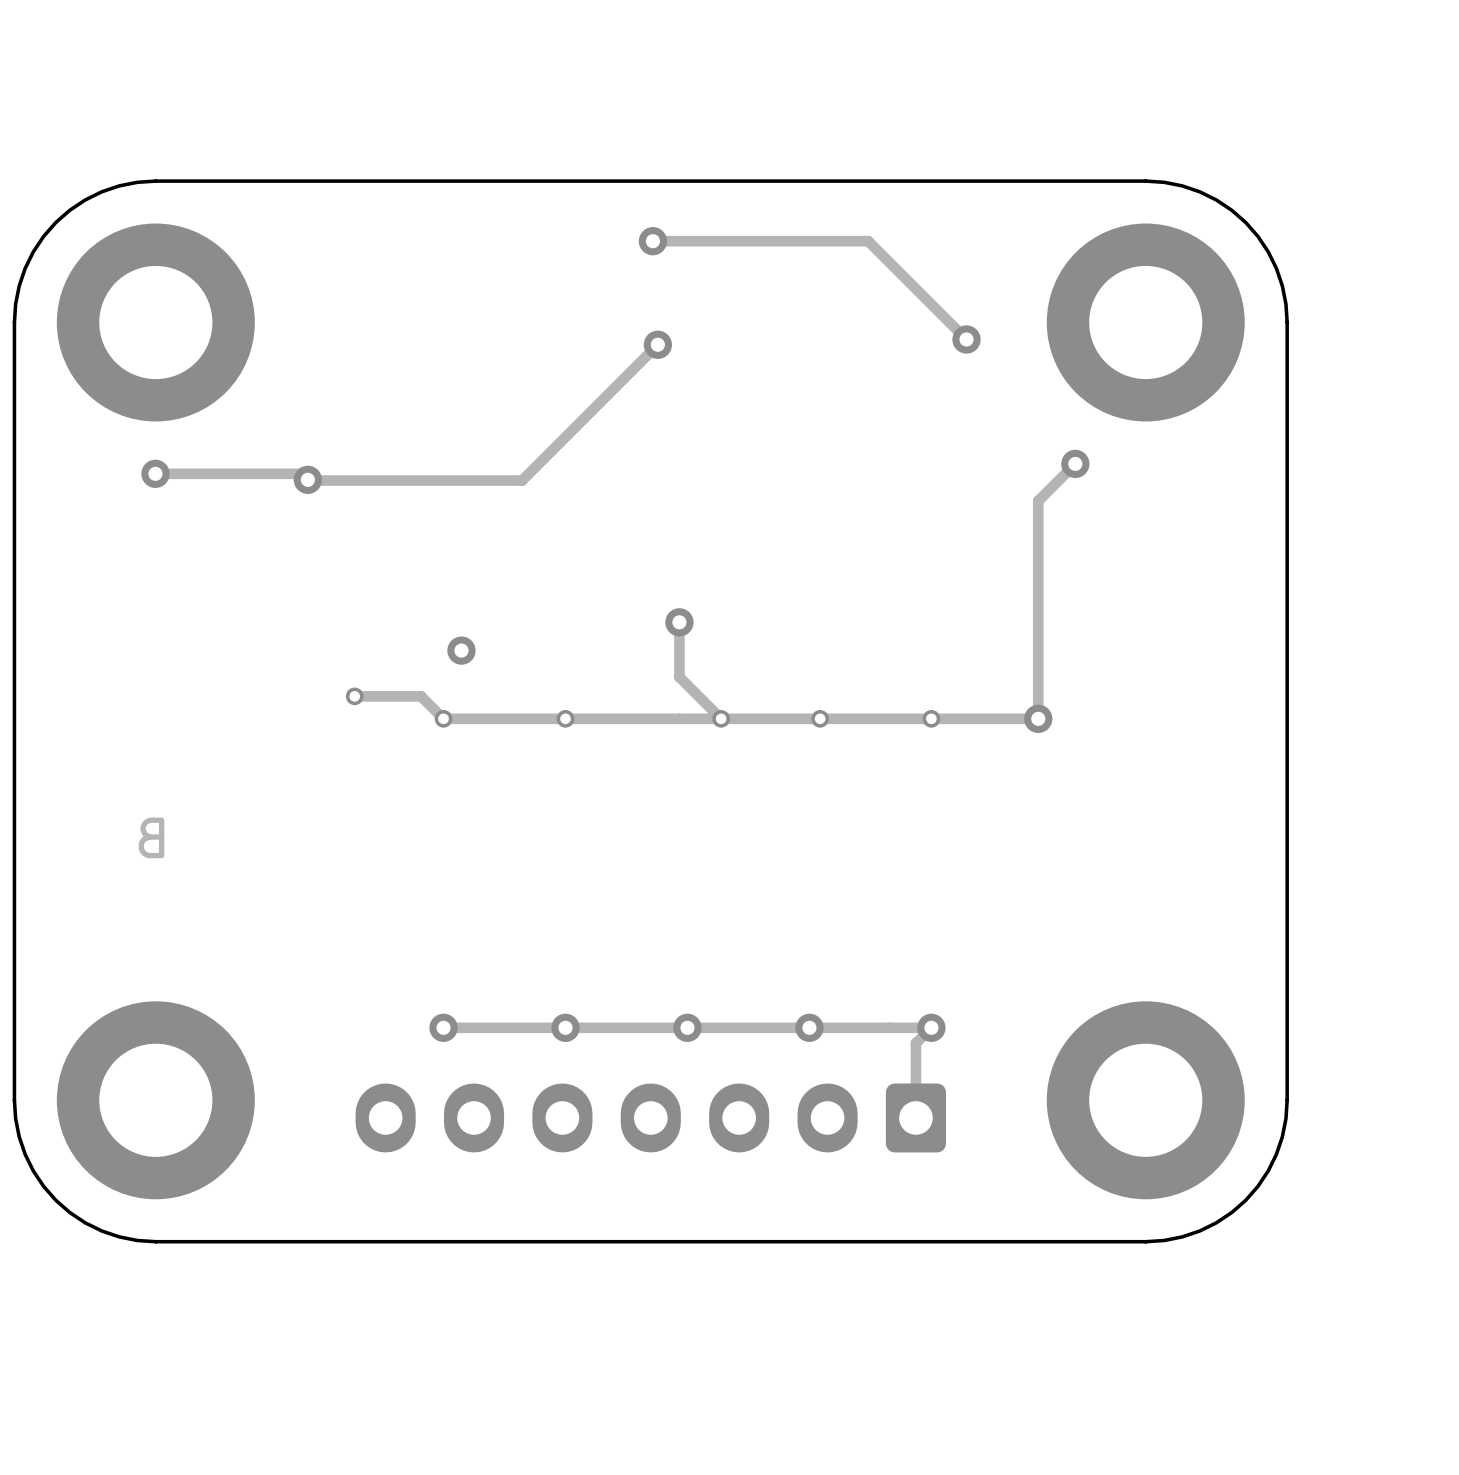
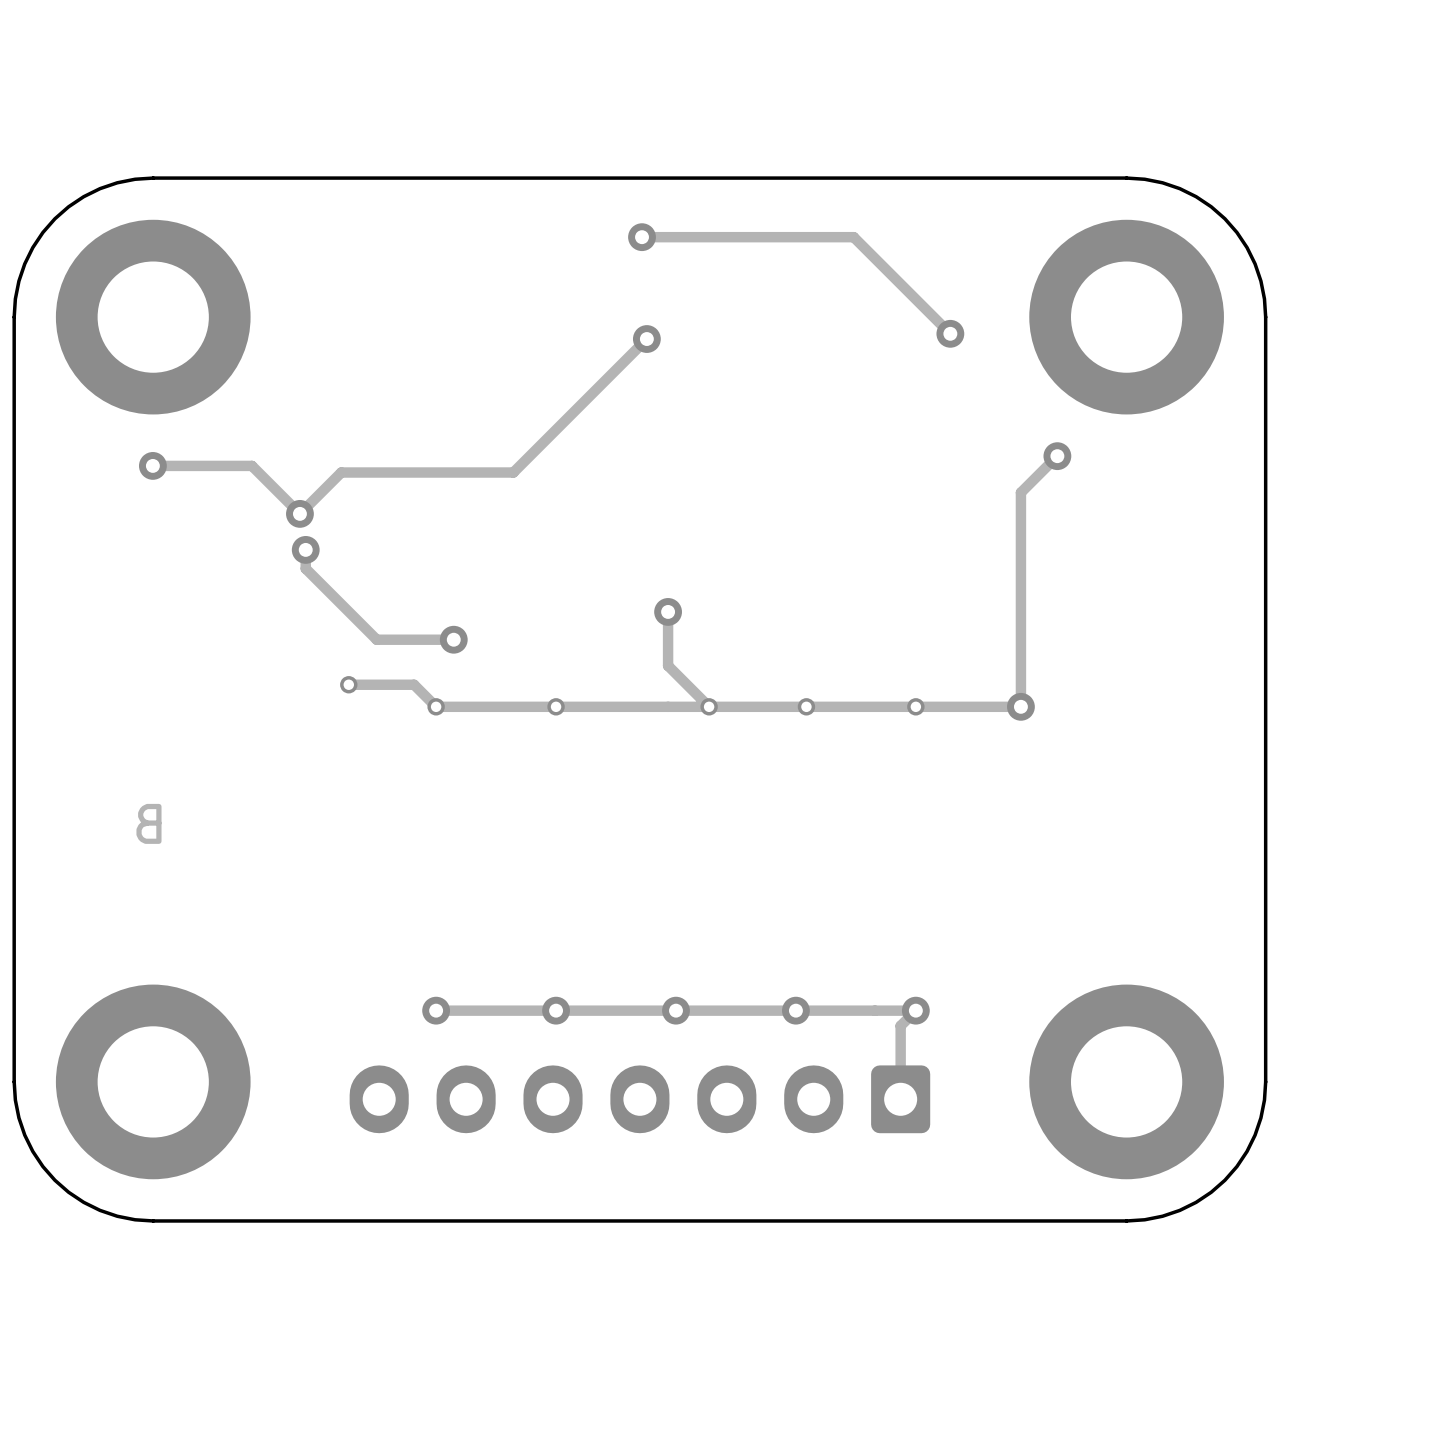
track: (256, 473) (301, 473) (308, 480) (347, 480) -> (251, 465) (299, 513) (341, 472)
via: (307, 479) -> none
via: none -> (299, 513)
track: none -> (305, 549) (305, 568) (376, 639) (453, 639)
via: none -> (305, 549)

